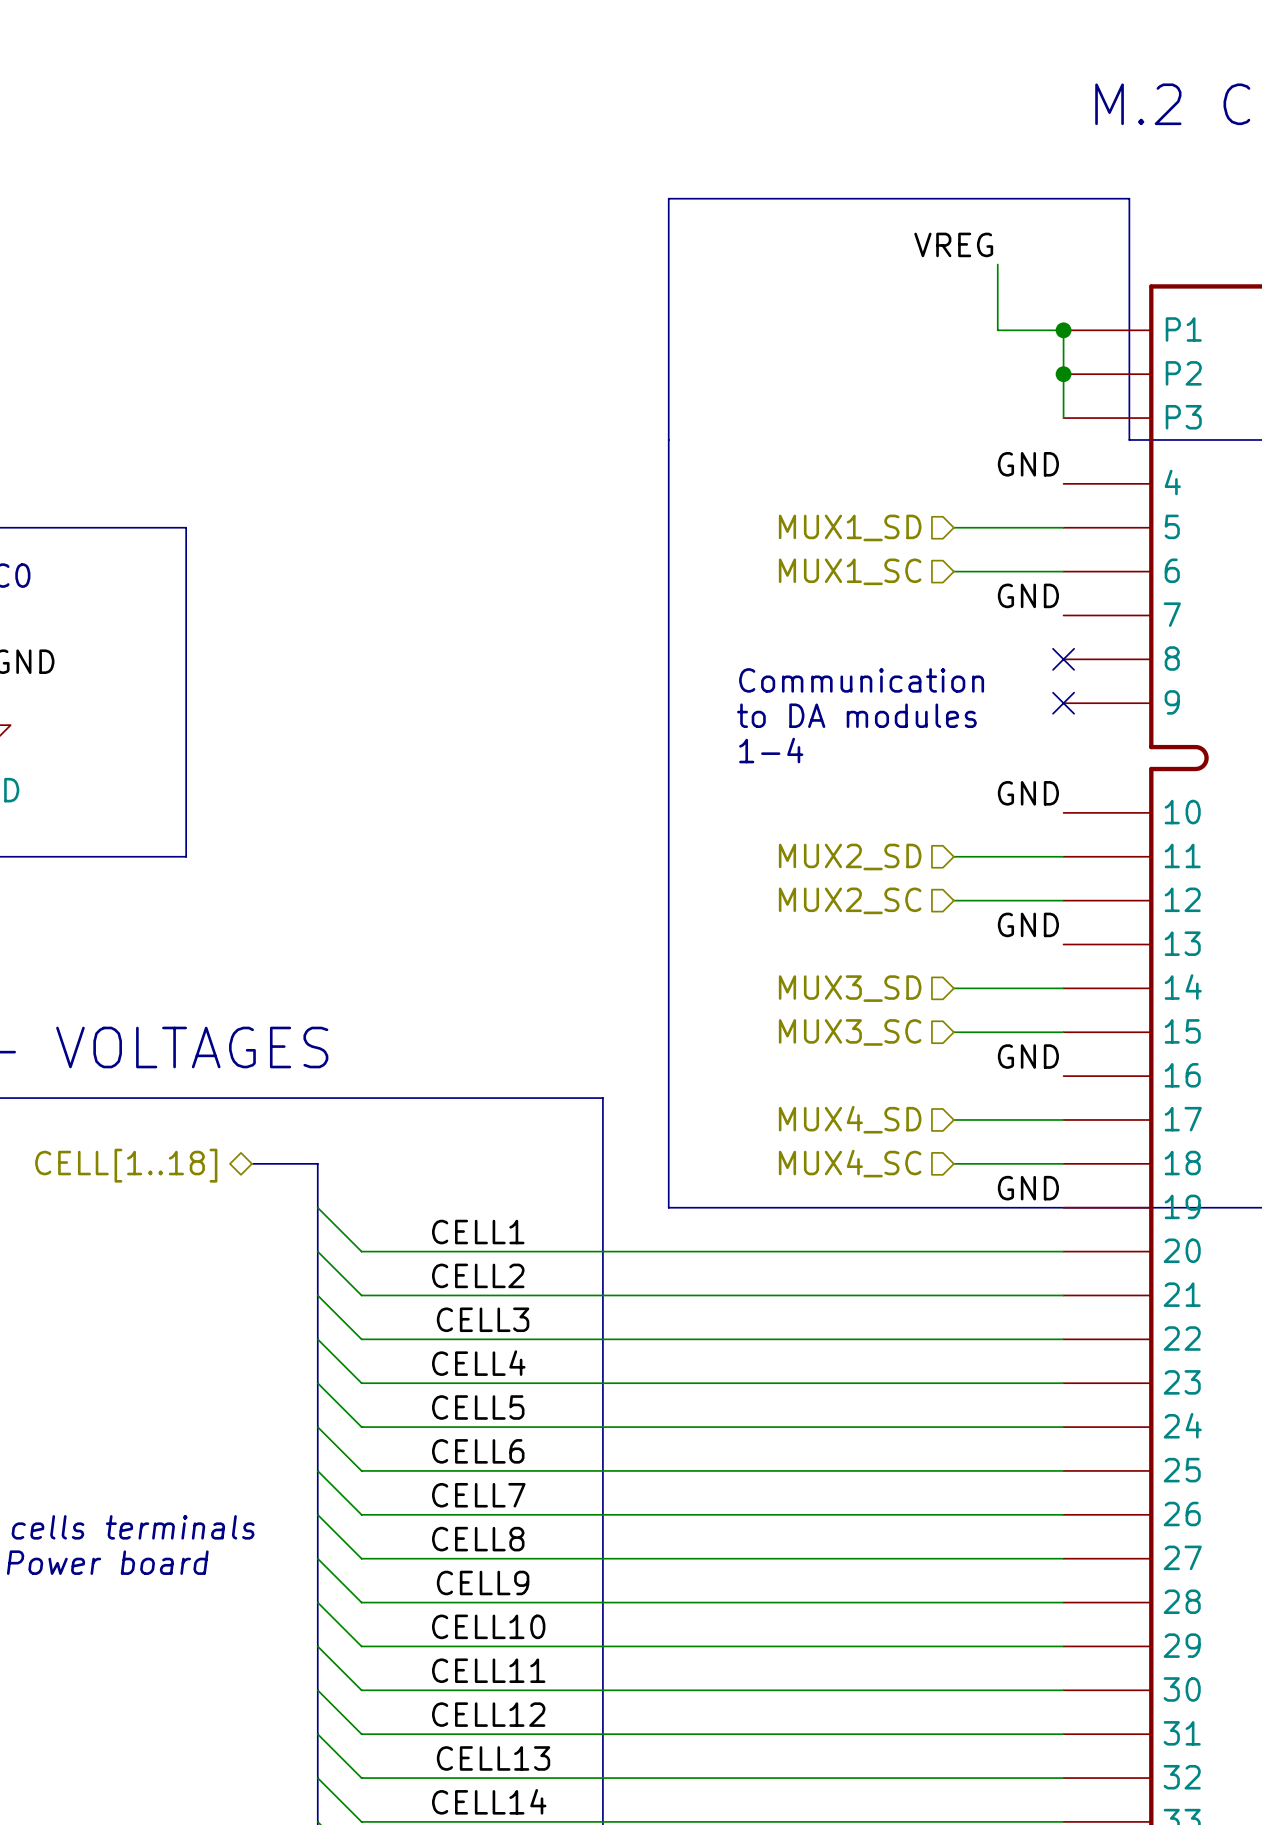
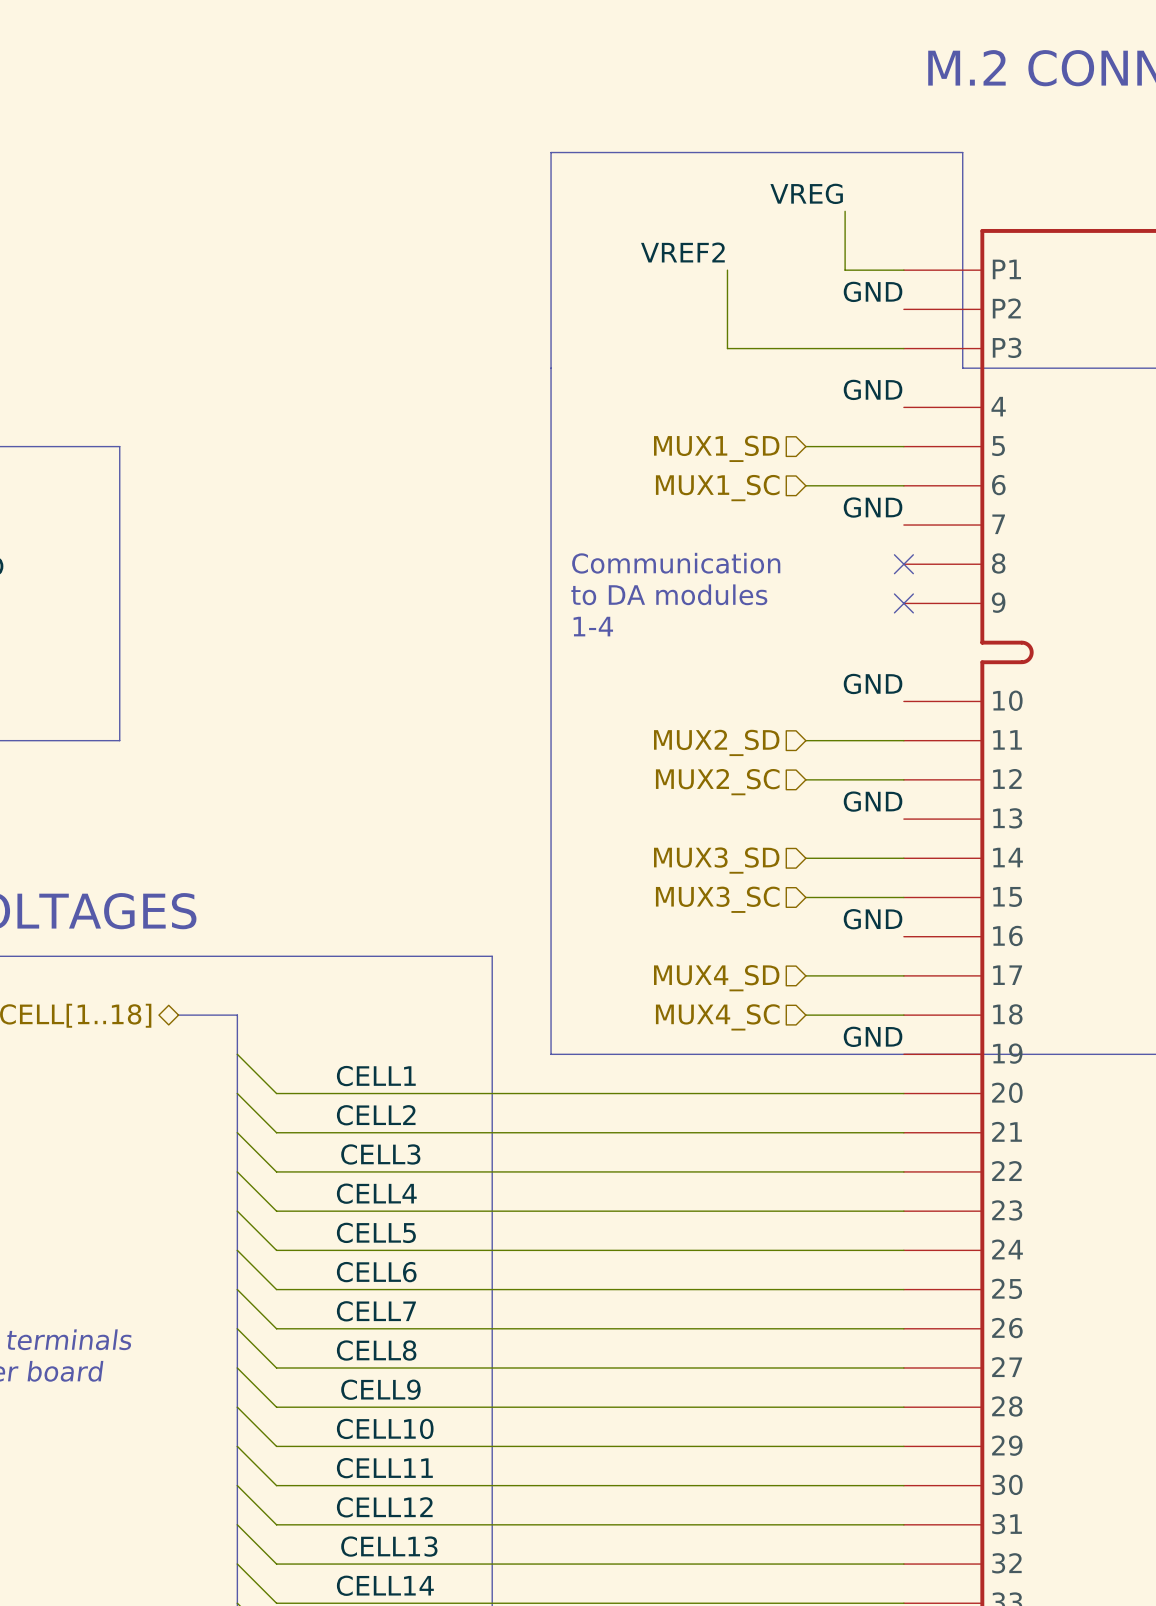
label: none -> VREF2 (682, 252)
wire: (1063, 330) (1063, 418) -> (727, 270) (727, 348) (903, 348)
junction: (1063, 330) -> none
label: none -> GND (873, 291)
junction: (1063, 374) -> none
text position: Communication (861, 680) -> Communication (676, 563)
text position: to DA modules (856, 715) -> to DA modules (669, 594)
text position: 1-4 (771, 750) -> 1-4 (593, 626)

